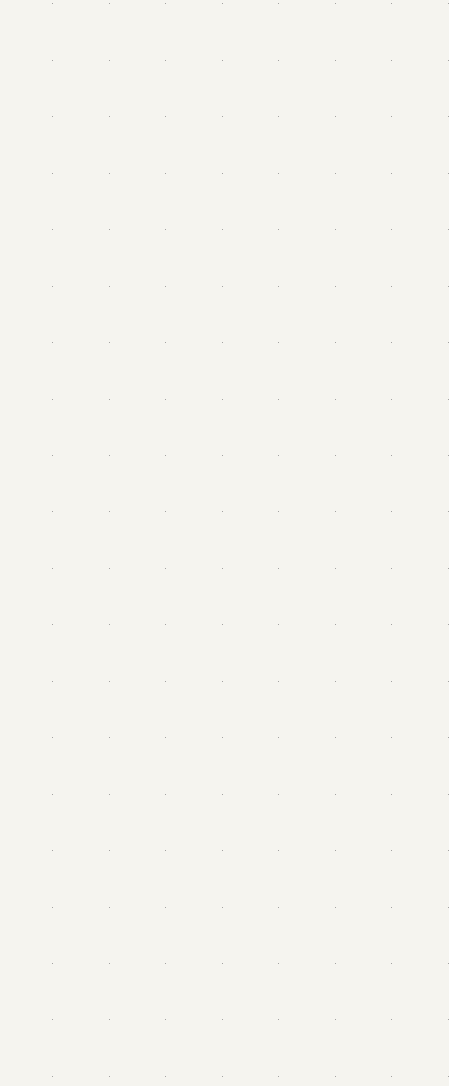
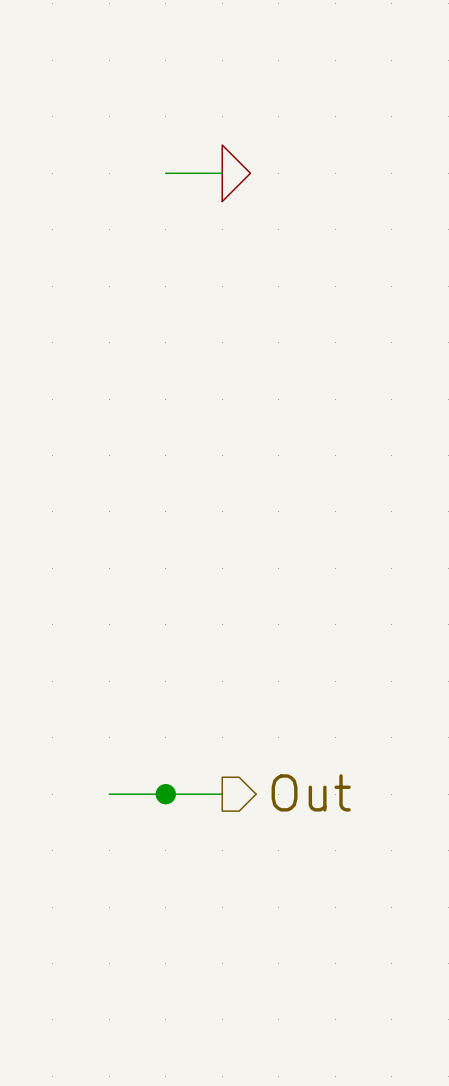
wire: none -> (165, 173) (222, 173)
power symbol: none -> (236, 173)
hierarchical label: none -> Out (311, 792)
wire: none -> (109, 794) (222, 794)
junction: none -> (165, 794)

